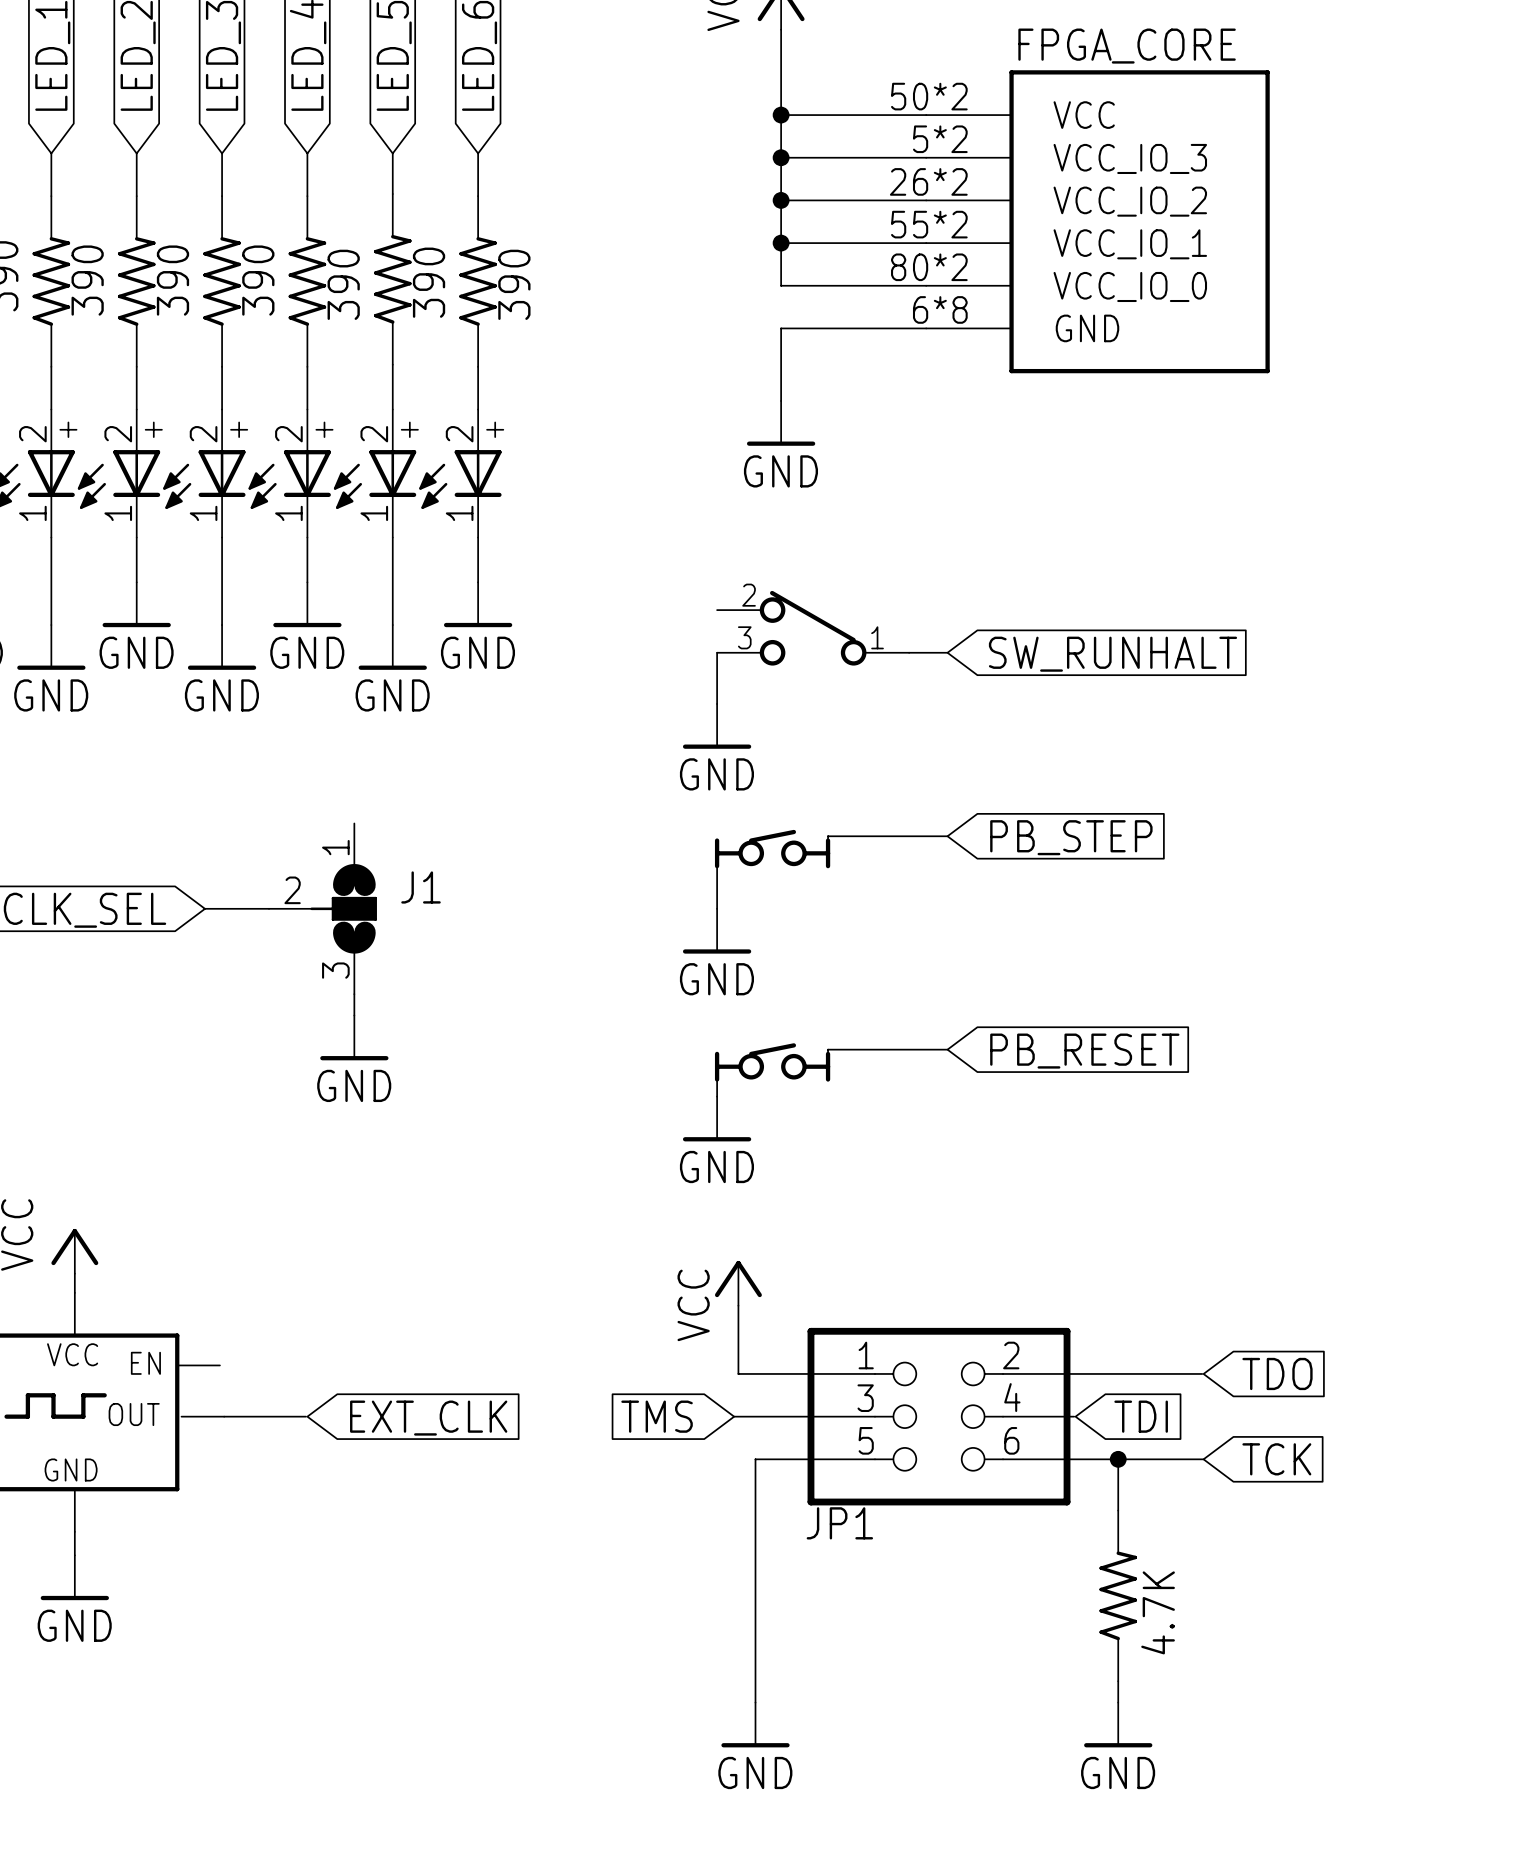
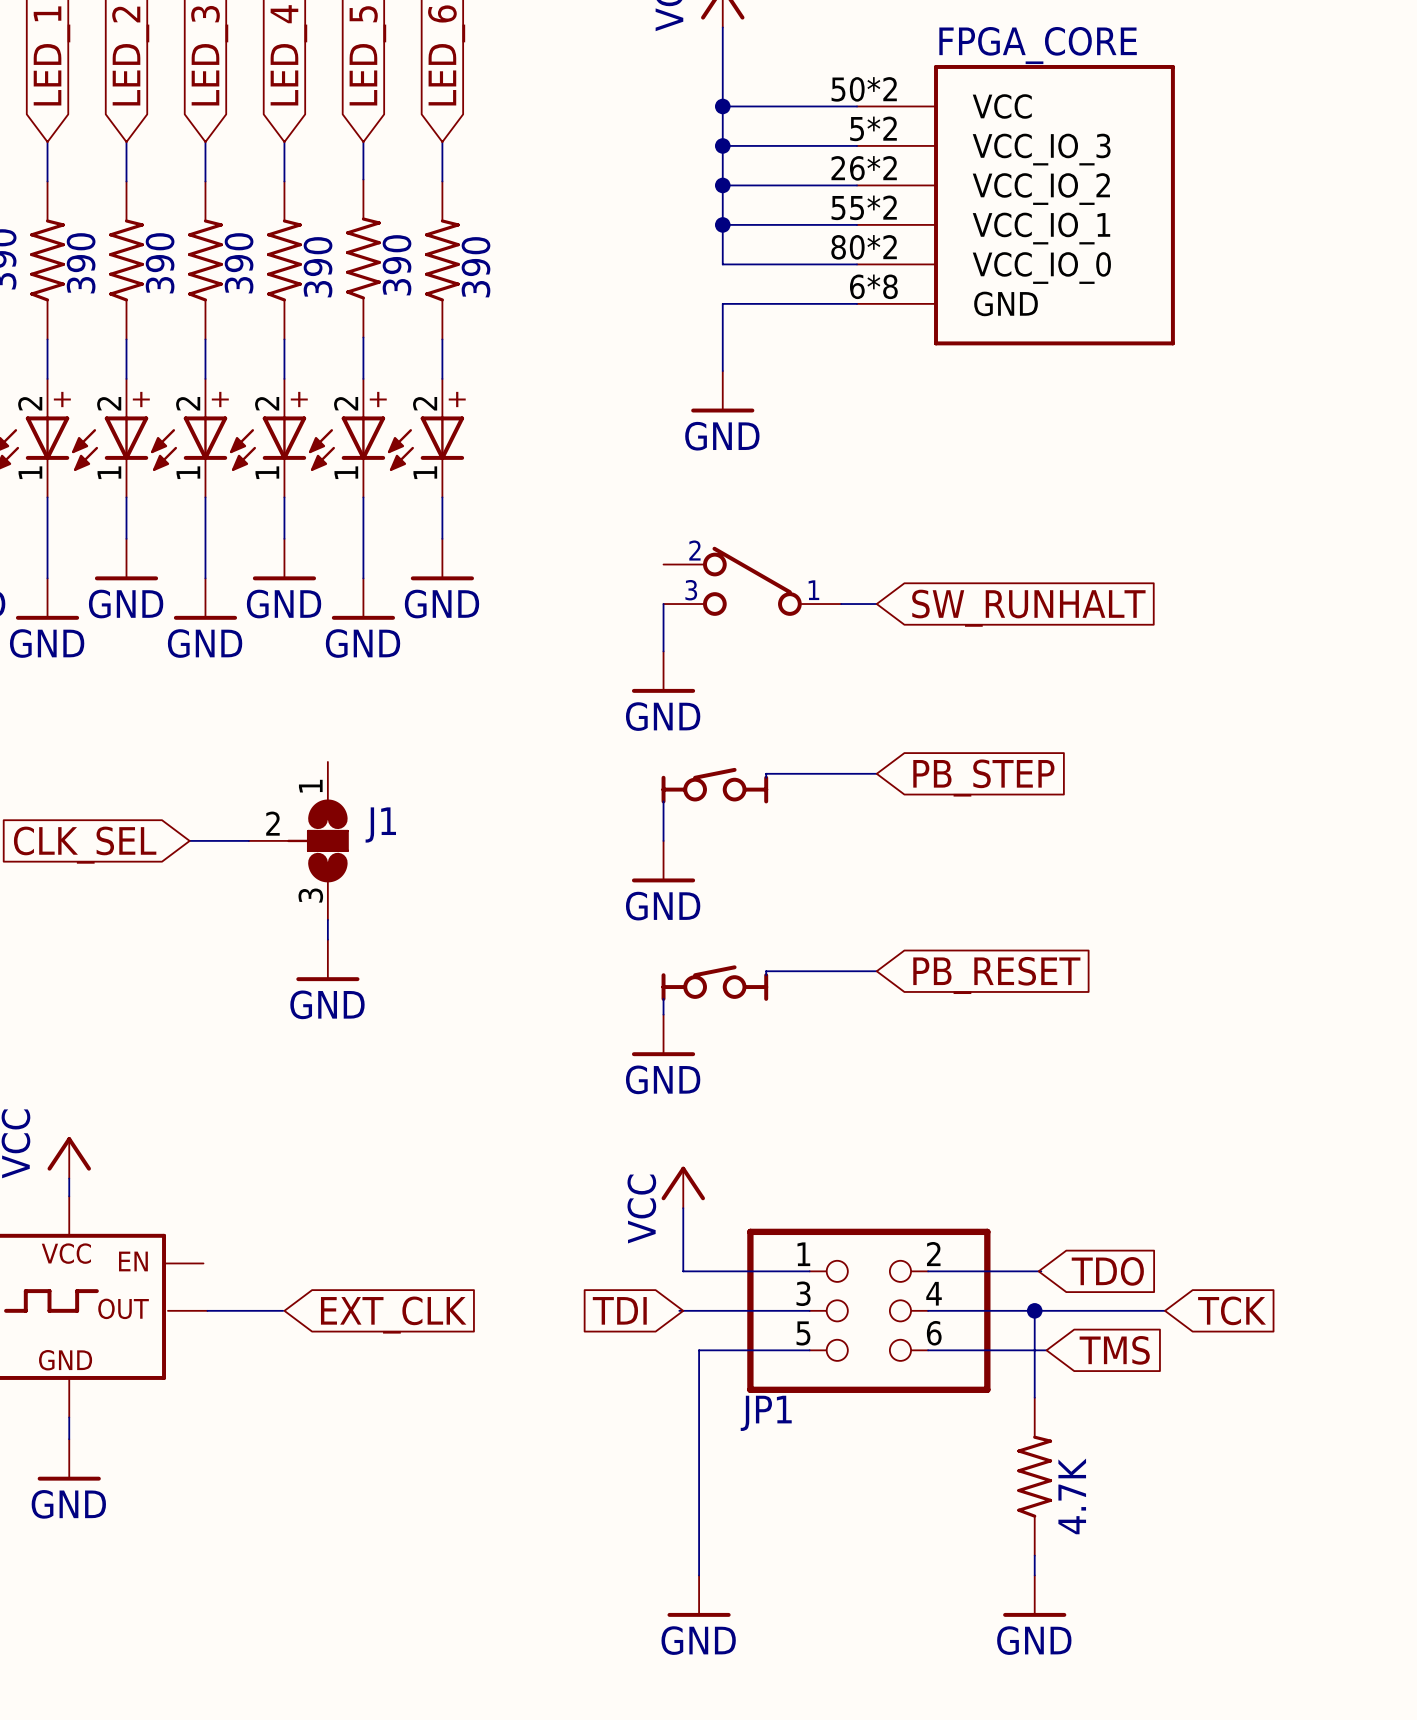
wire: (1125, 1373) (1202, 1373) -> none
global label position: TDO (1277, 1373) -> TDO (1107, 1271)
global label: TMS (657, 1416) -> TDI (619, 1310)
wire: none -> (993, 1310) (1165, 1310)
wire: none -> (1034, 1310) (1034, 1350)
global label: TDI (1141, 1416) -> none
junction position: (1118, 1459) -> (1034, 1310)
wire: (1131, 1459) (1203, 1459) -> none
global label: none -> TMS (1114, 1350)
global label position: TCK (1276, 1459) -> TCK (1232, 1310)

